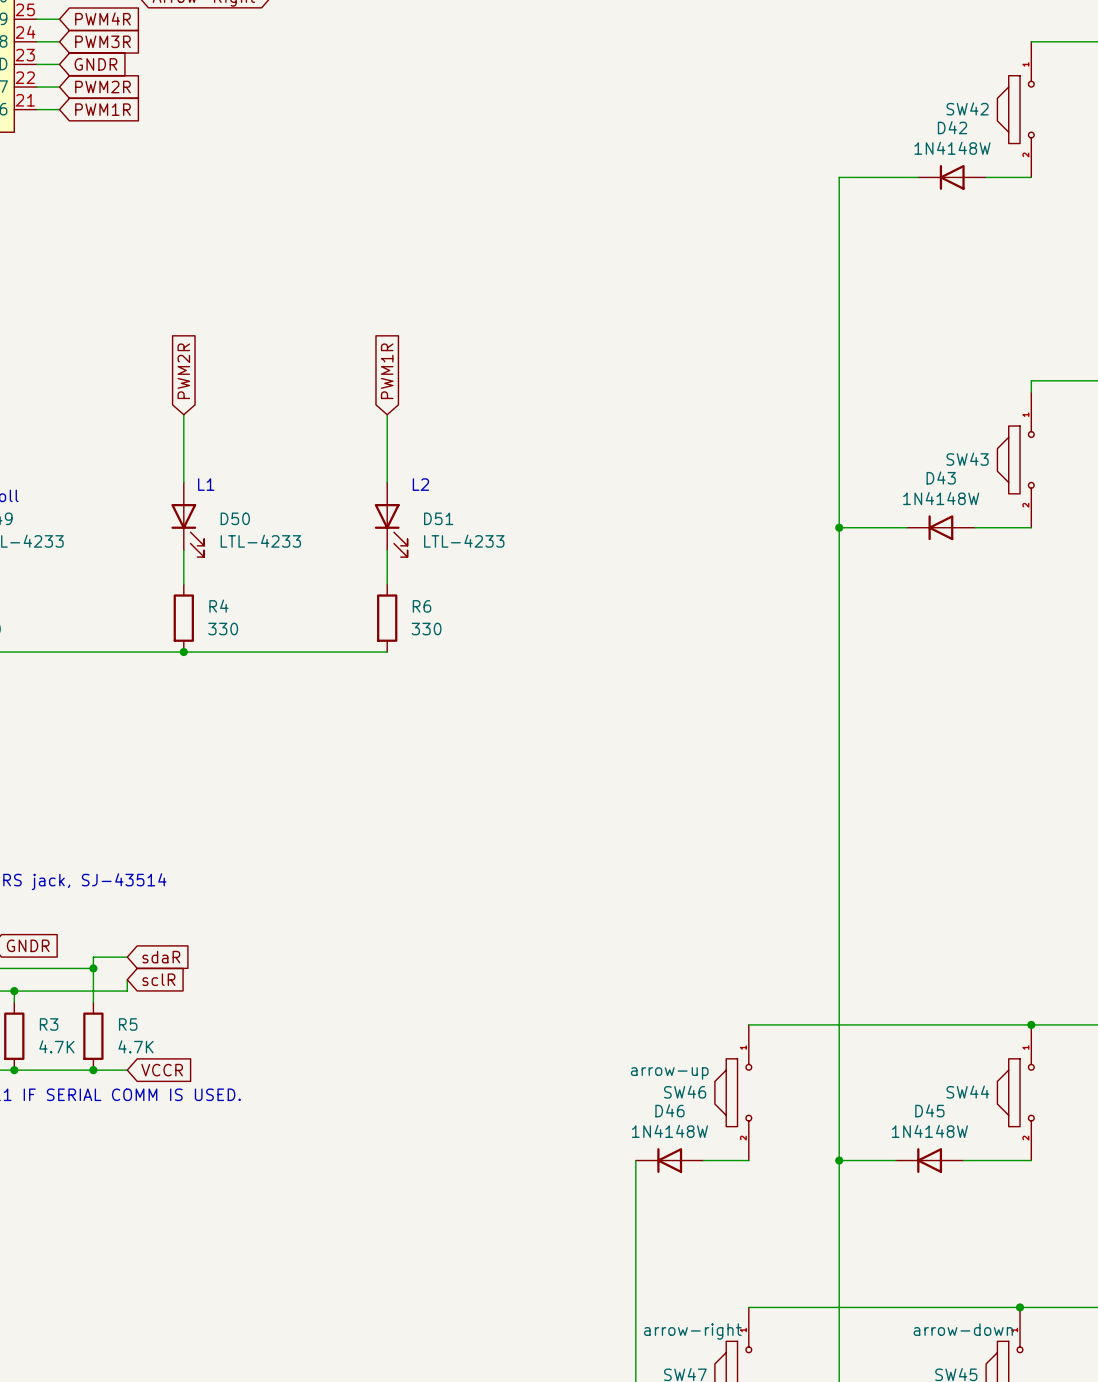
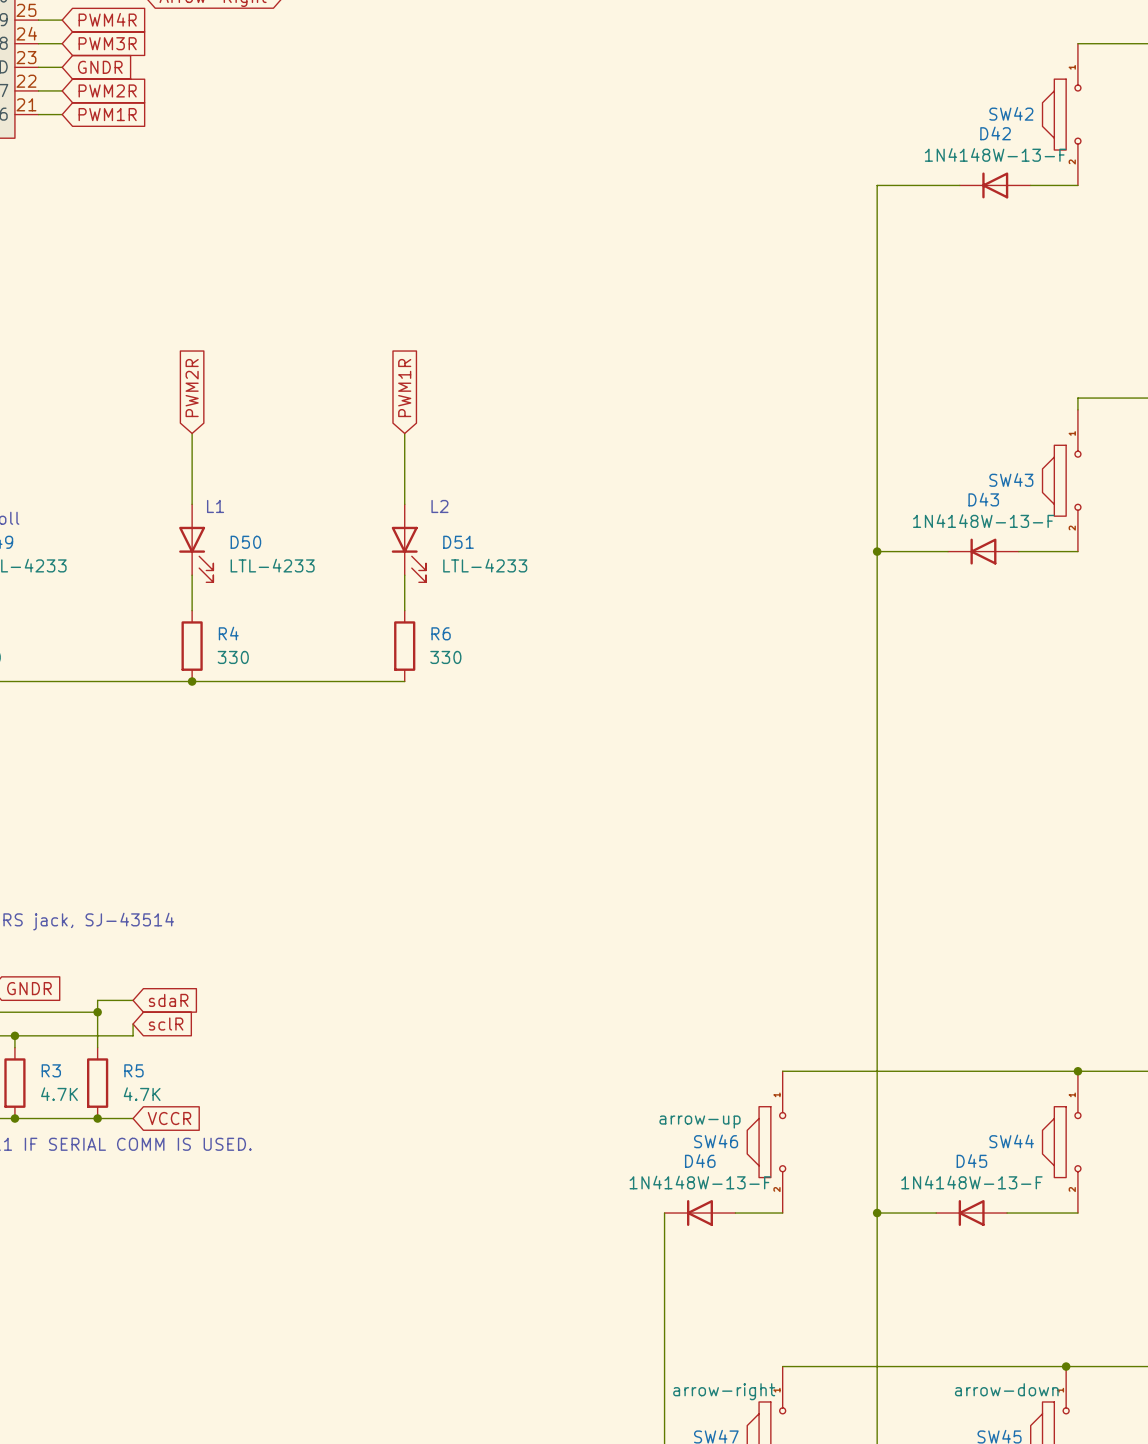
D42 value: 1N4148W (952, 148) -> 1N4148W-13-F (995, 154)
D43 value: 1N4148W (941, 498) -> 1N4148W-13-F (983, 521)
D46 value: 1N4148W (669, 1131) -> 1N4148W-13-F (700, 1182)
D45 value: 1N4148W (929, 1131) -> 1N4148W-13-F (971, 1182)

